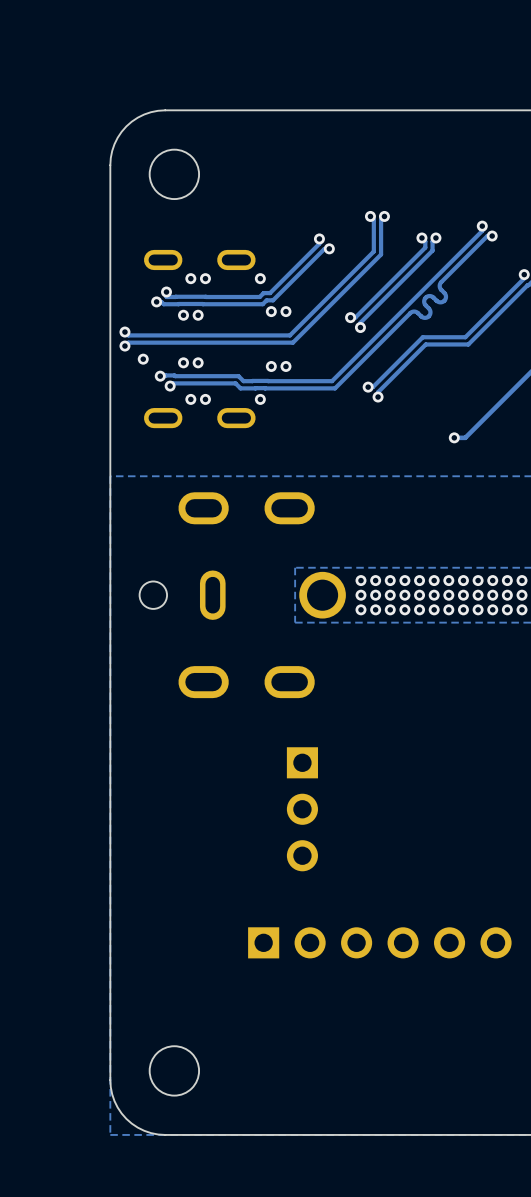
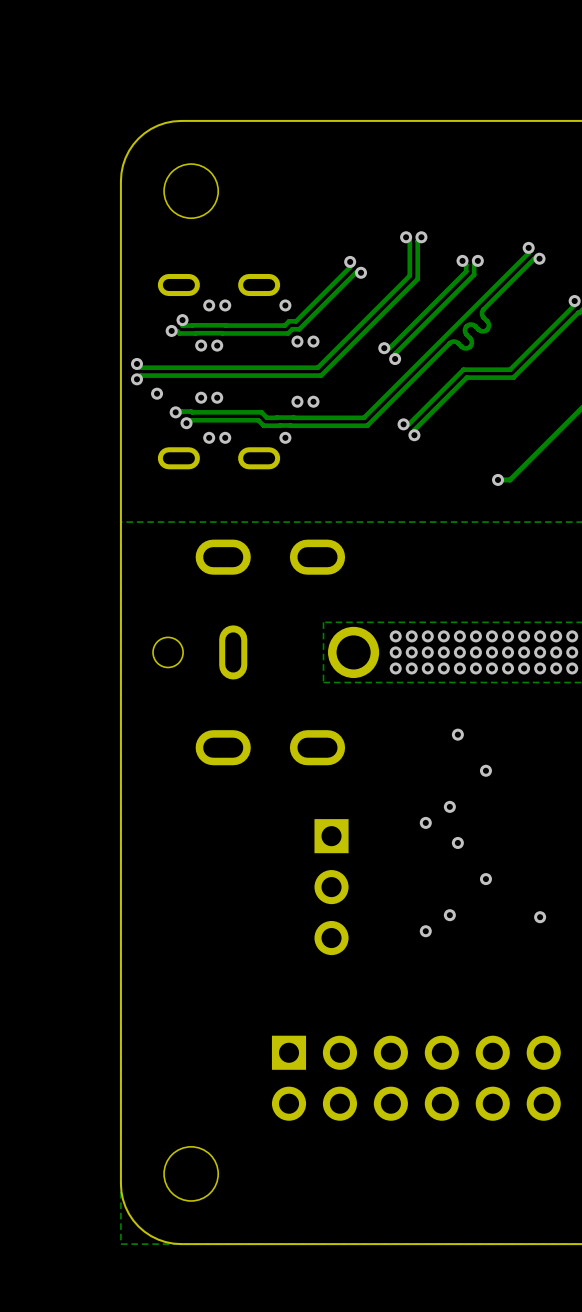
via: none -> (457, 734)
via: none -> (485, 770)
via: none -> (449, 806)
via: none -> (425, 822)
via: none -> (457, 842)
via: none -> (485, 879)
via: none -> (449, 915)
via: none -> (540, 917)
via: none -> (425, 931)
part: (379, 942) -> none
part: none -> (416, 1078)

